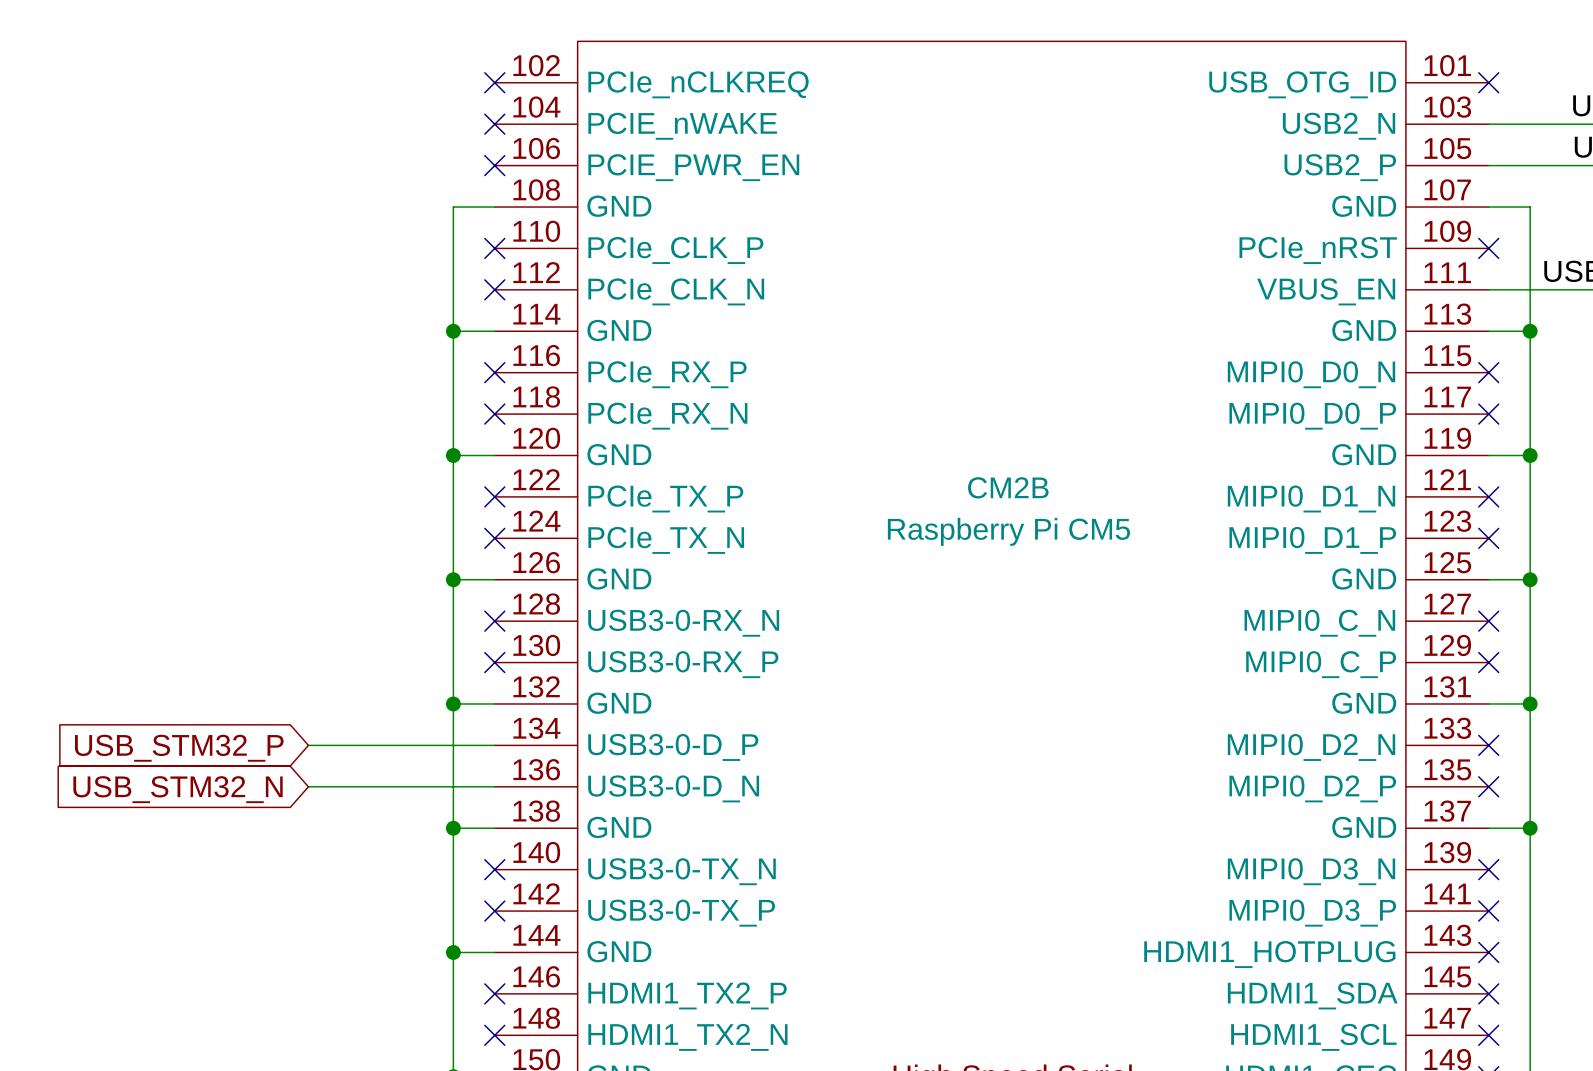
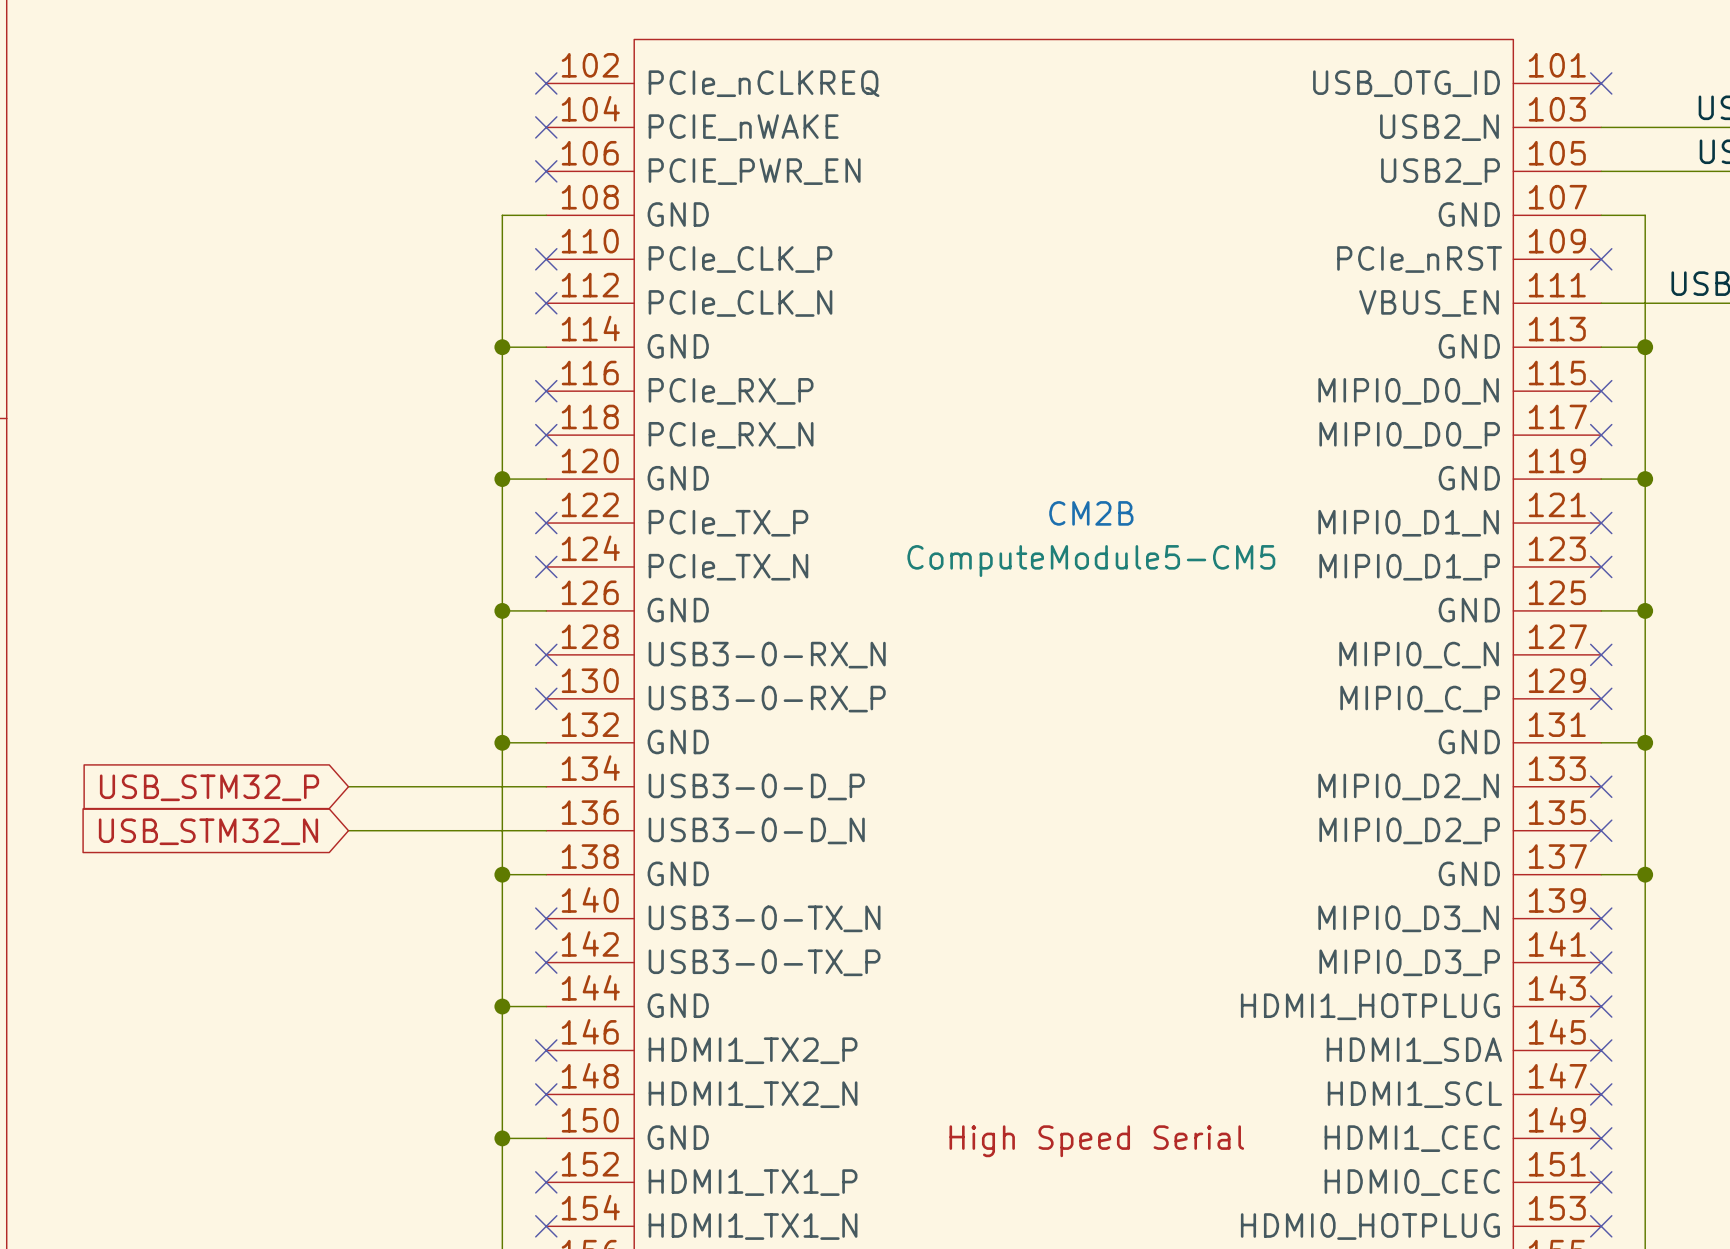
CM2B value: Raspberry Pi CM5 (1008, 531) -> ComputeModule5-CM5 (1091, 561)

